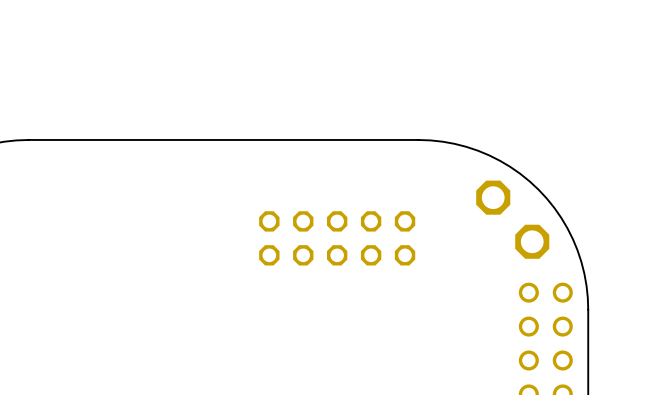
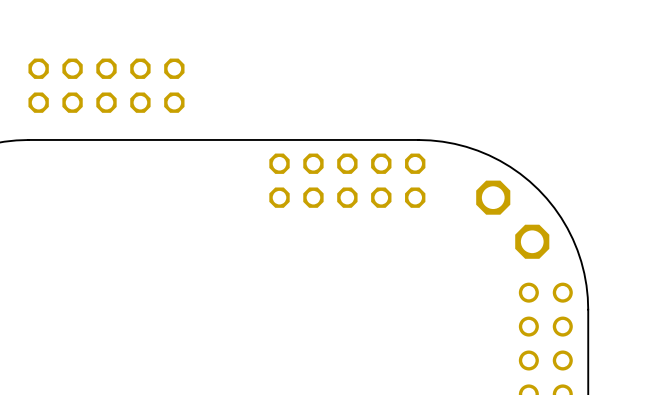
part: none -> (106, 85)
part position: (337, 238) -> (347, 180)

